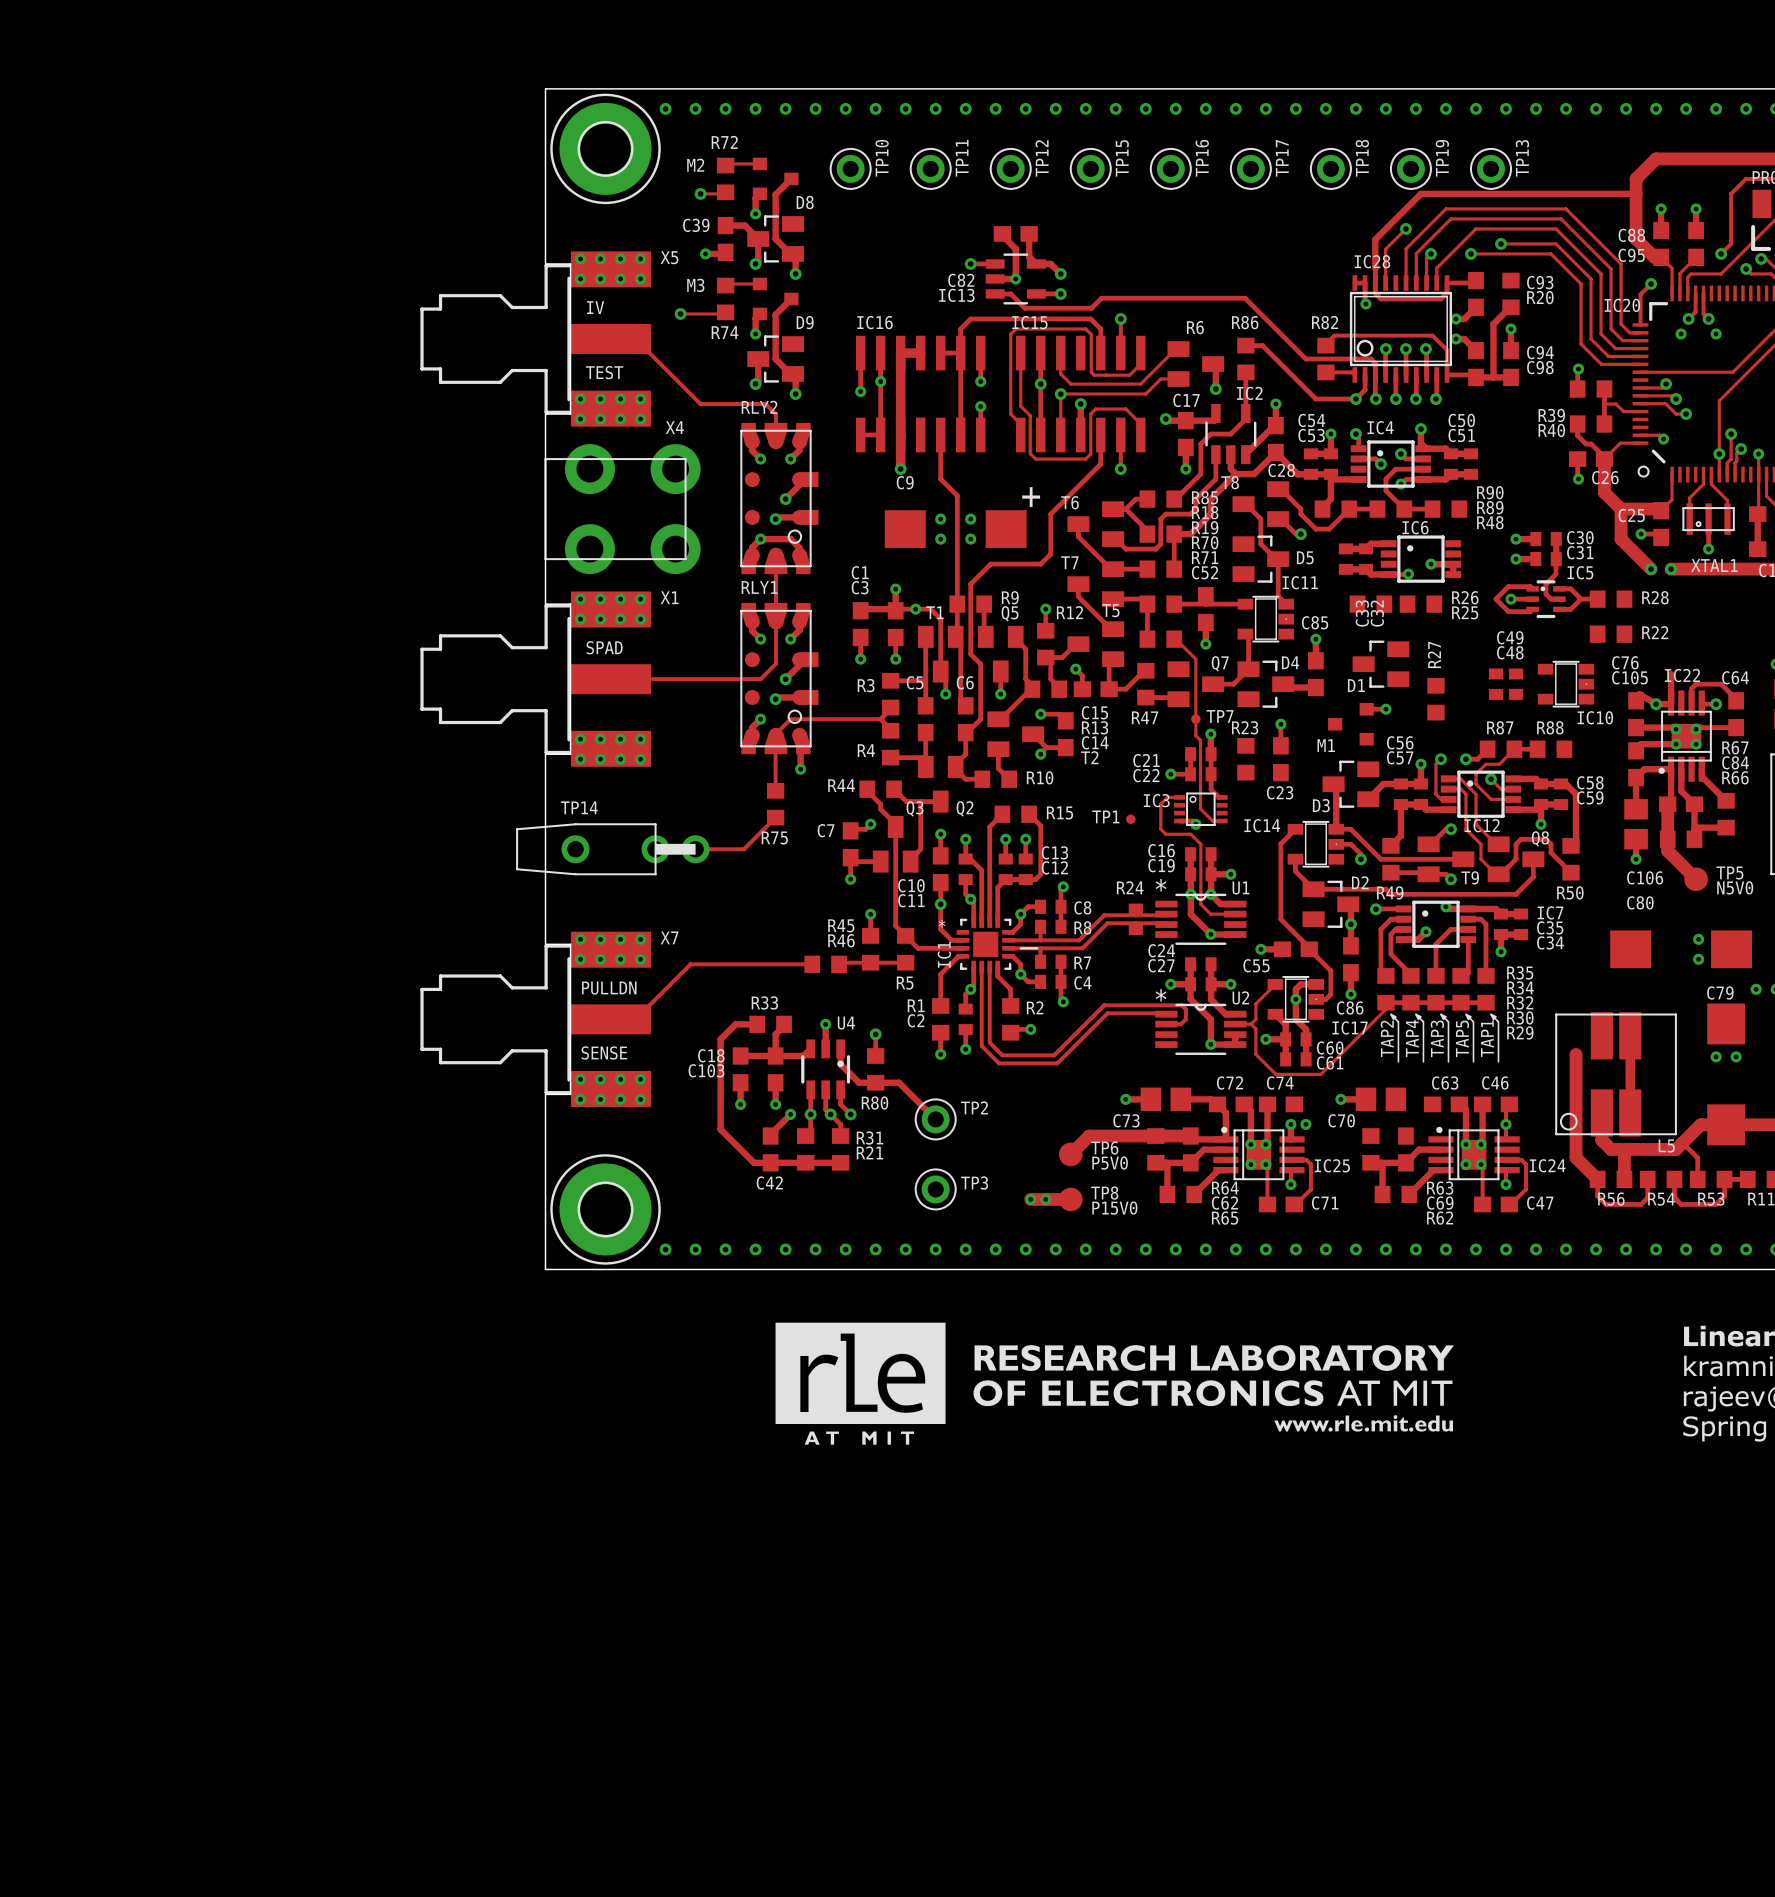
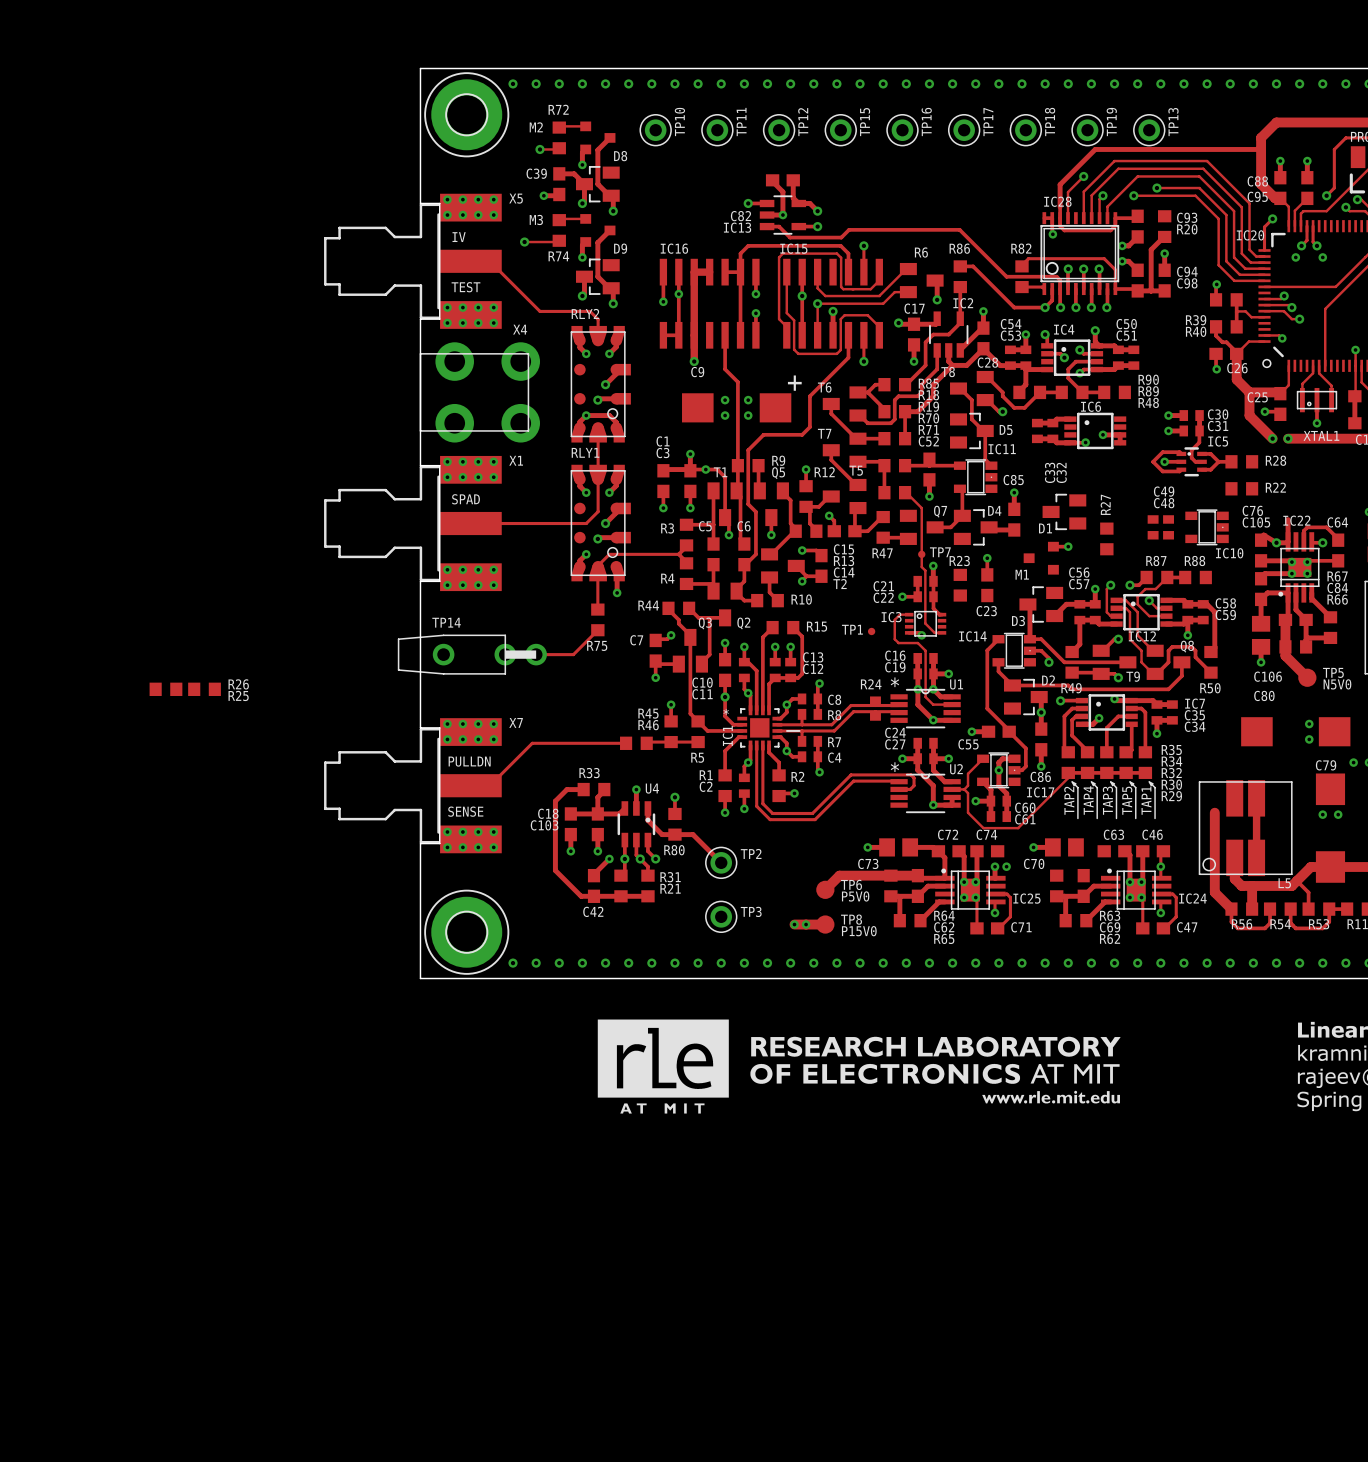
track: (1731, 434) (1731, 459) (1727, 463) (1727, 474) -> none
via: (1731, 434) -> none
track: (1741, 449) (1736, 453) (1735, 474) -> none
via: (1741, 449) -> none
via: (1719, 454) -> none
R25 position: (1370, 604) -> (165, 689)
R26 position: (1420, 604) -> (204, 689)

